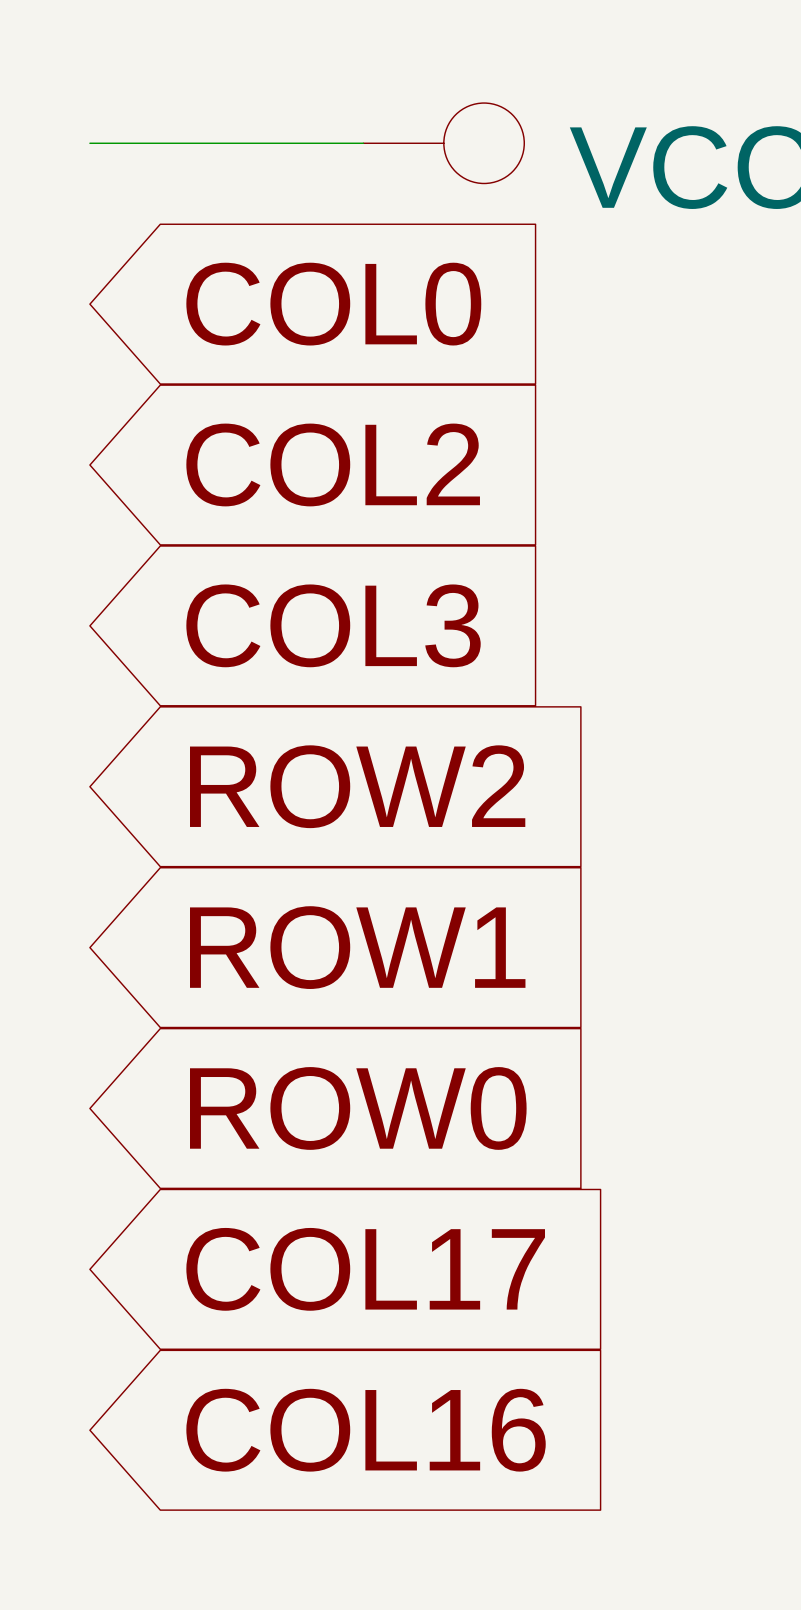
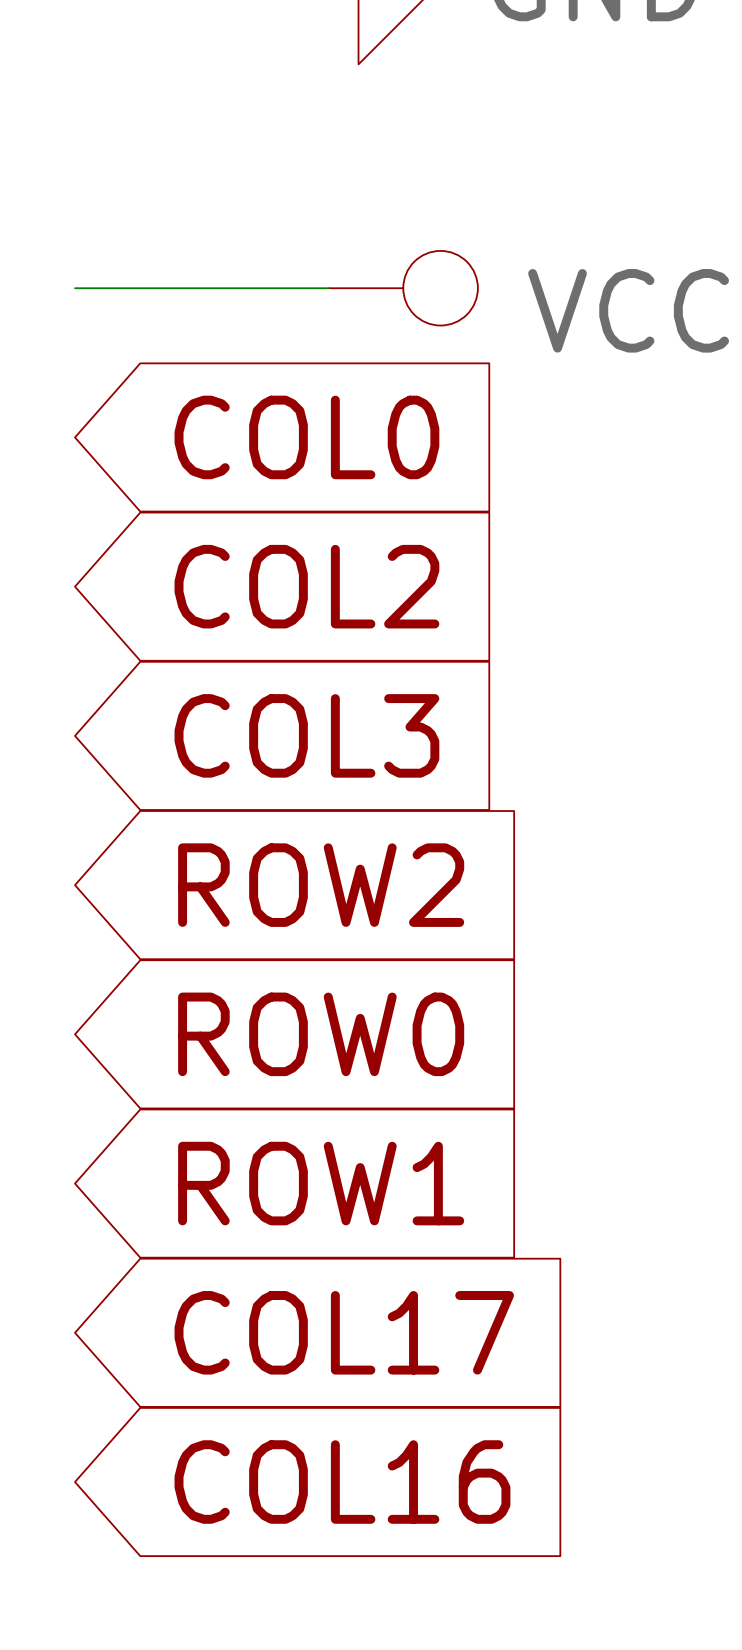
global label: ROW1 (357, 947) -> ROW0 (321, 1034)
global label: ROW0 (358, 1108) -> ROW1 (321, 1183)

